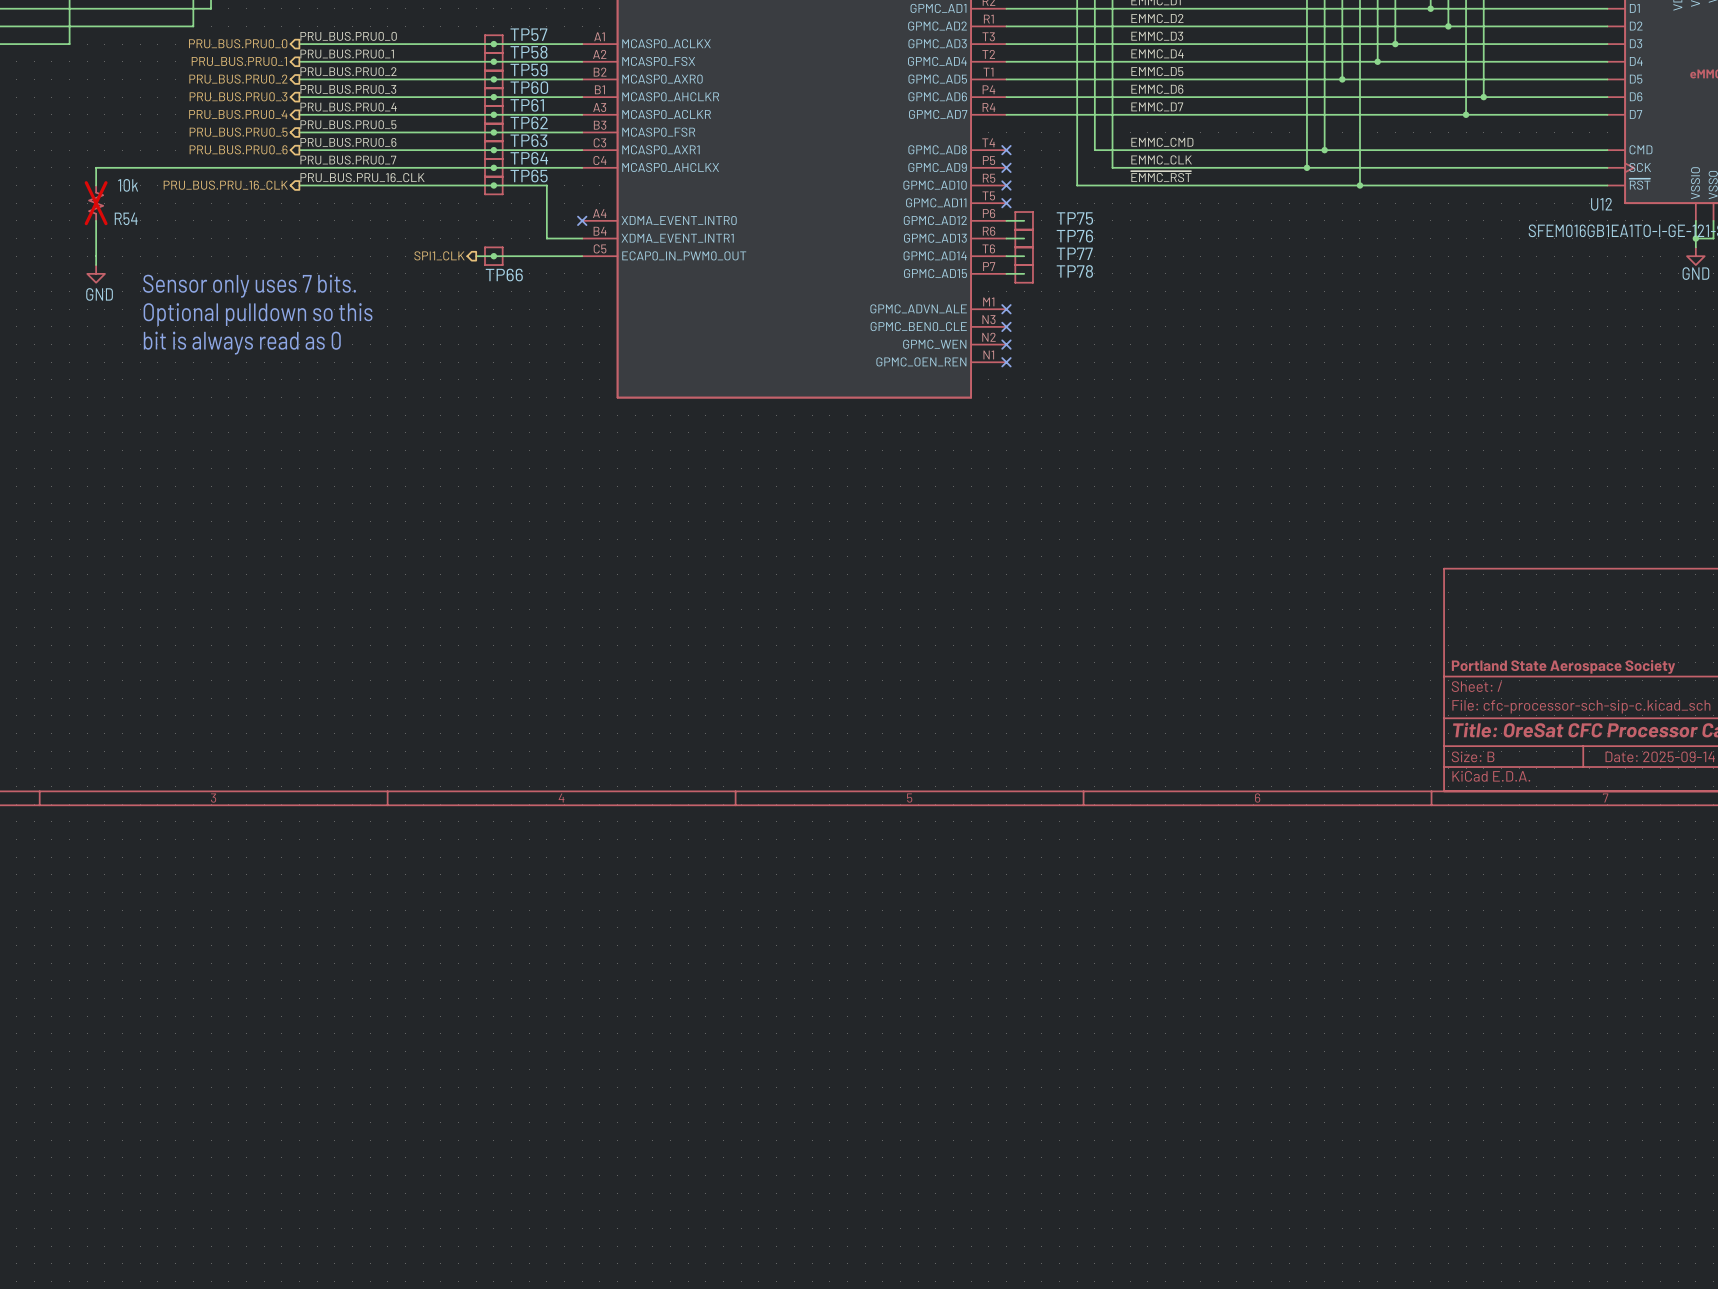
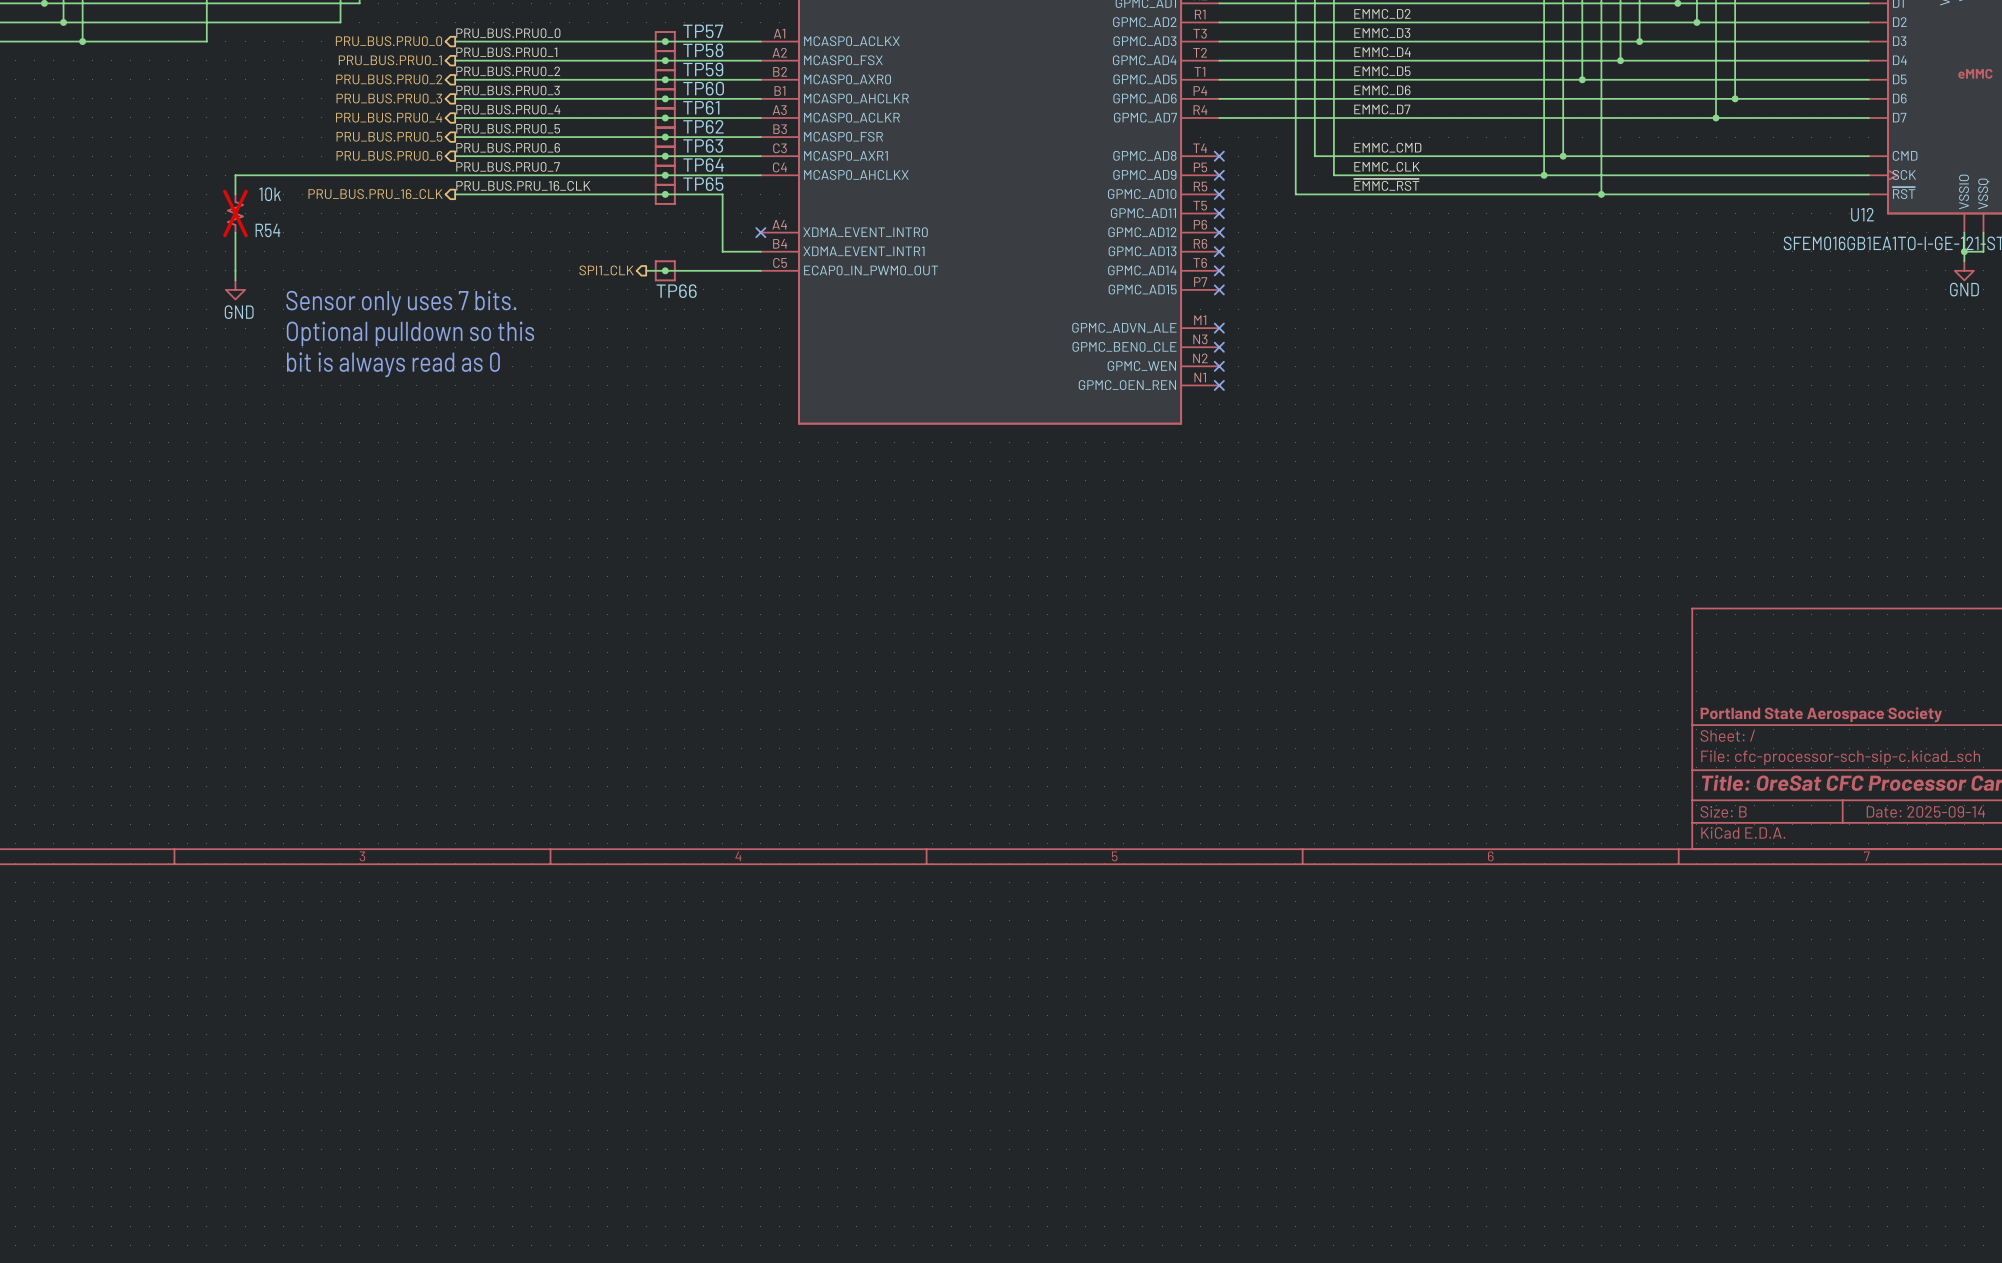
wire: (1006, 220) (1024, 220) -> none
no-connect mark: none -> (1219, 232)
TP75: (1024, 220) -> none
wire: (1006, 238) (1024, 238) -> none
no-connect mark: none -> (1219, 251)
TP76: (1024, 238) -> none
wire: (1006, 256) (1024, 256) -> none
no-connect mark: none -> (1219, 270)
TP77: (1024, 256) -> none
wire: (1006, 273) (1024, 273) -> none
no-connect mark: none -> (1219, 289)
TP78: (1024, 273) -> none

